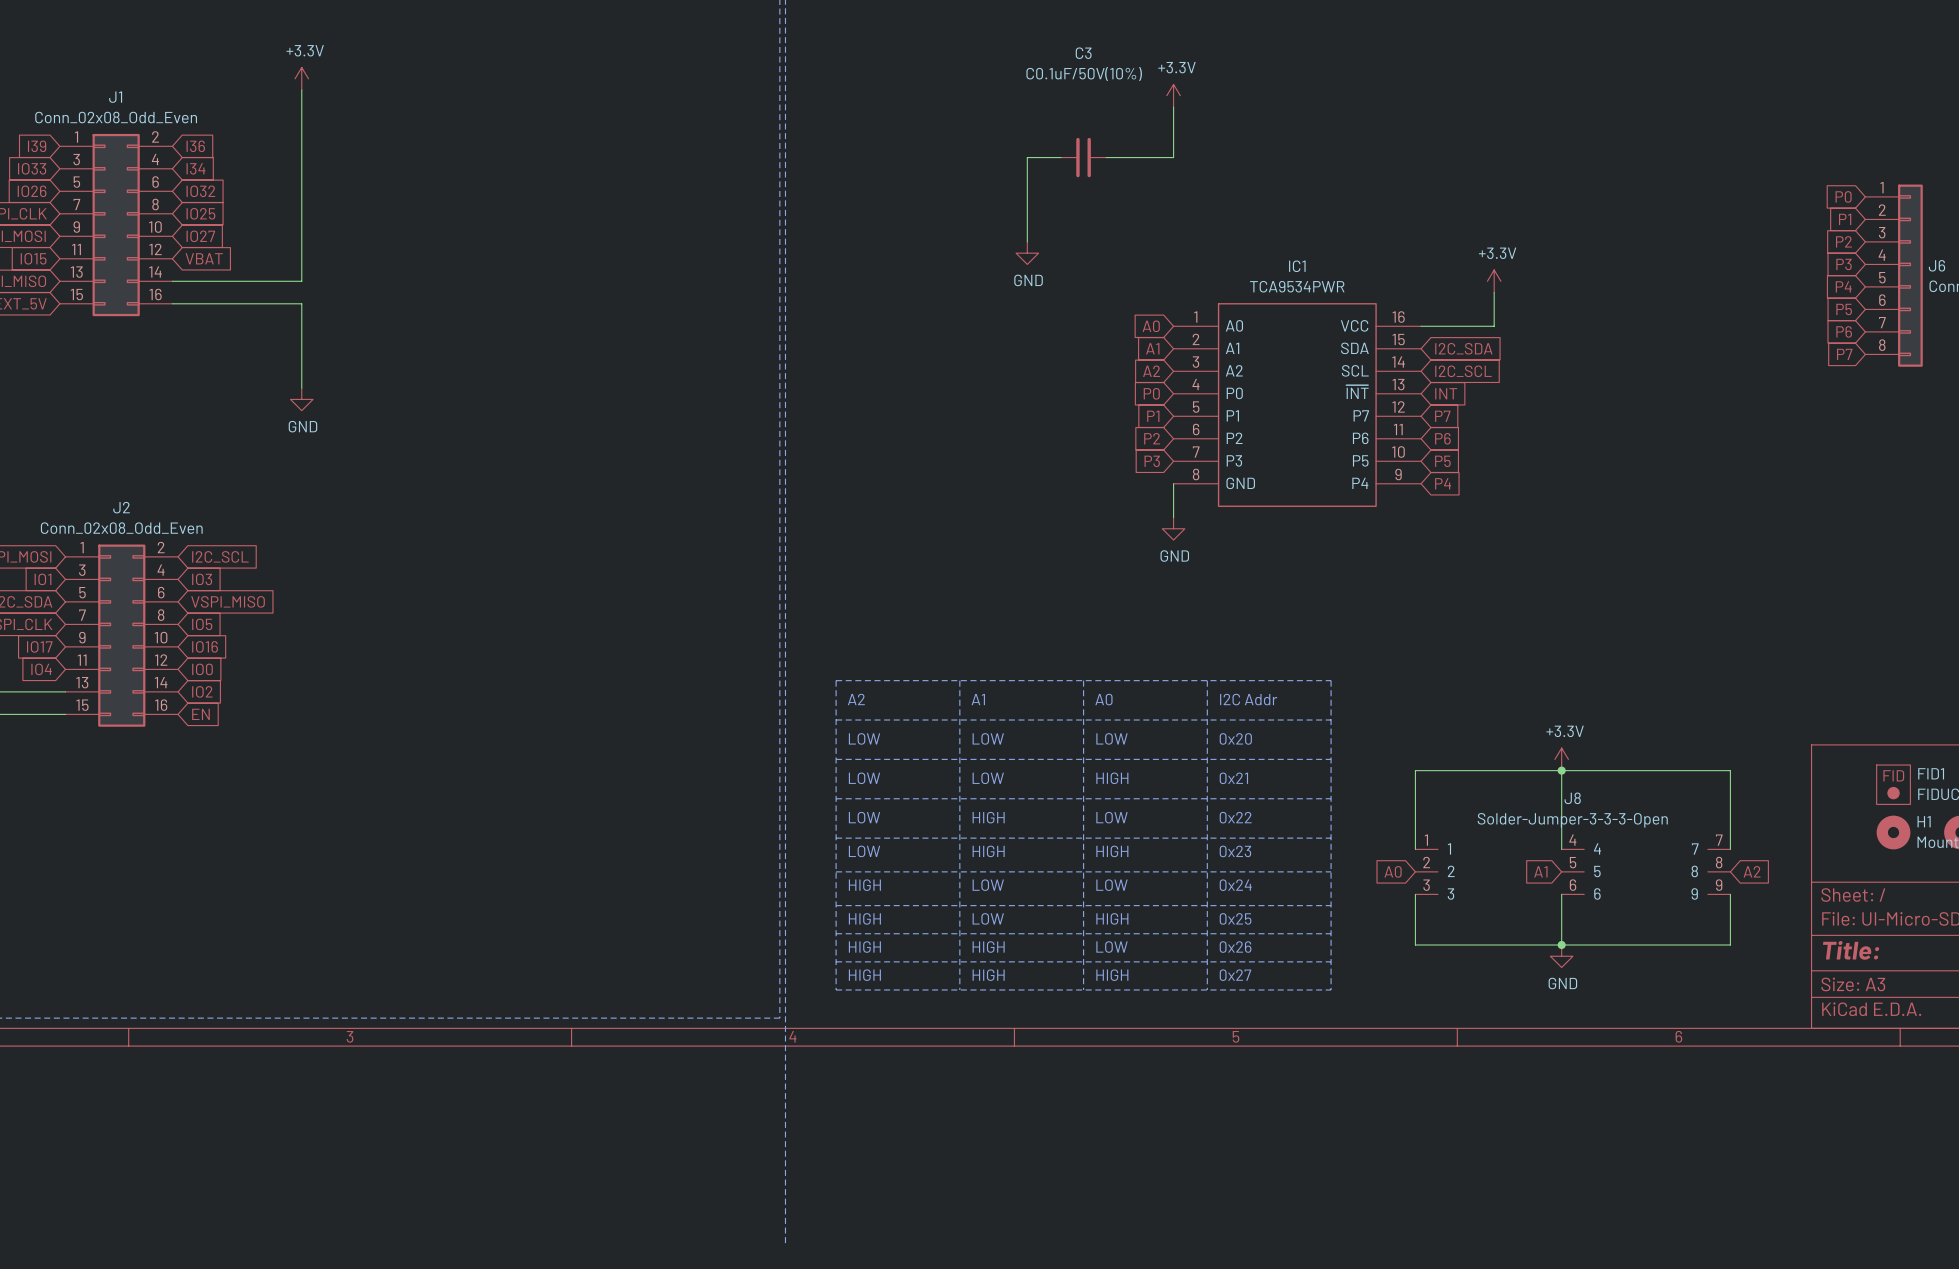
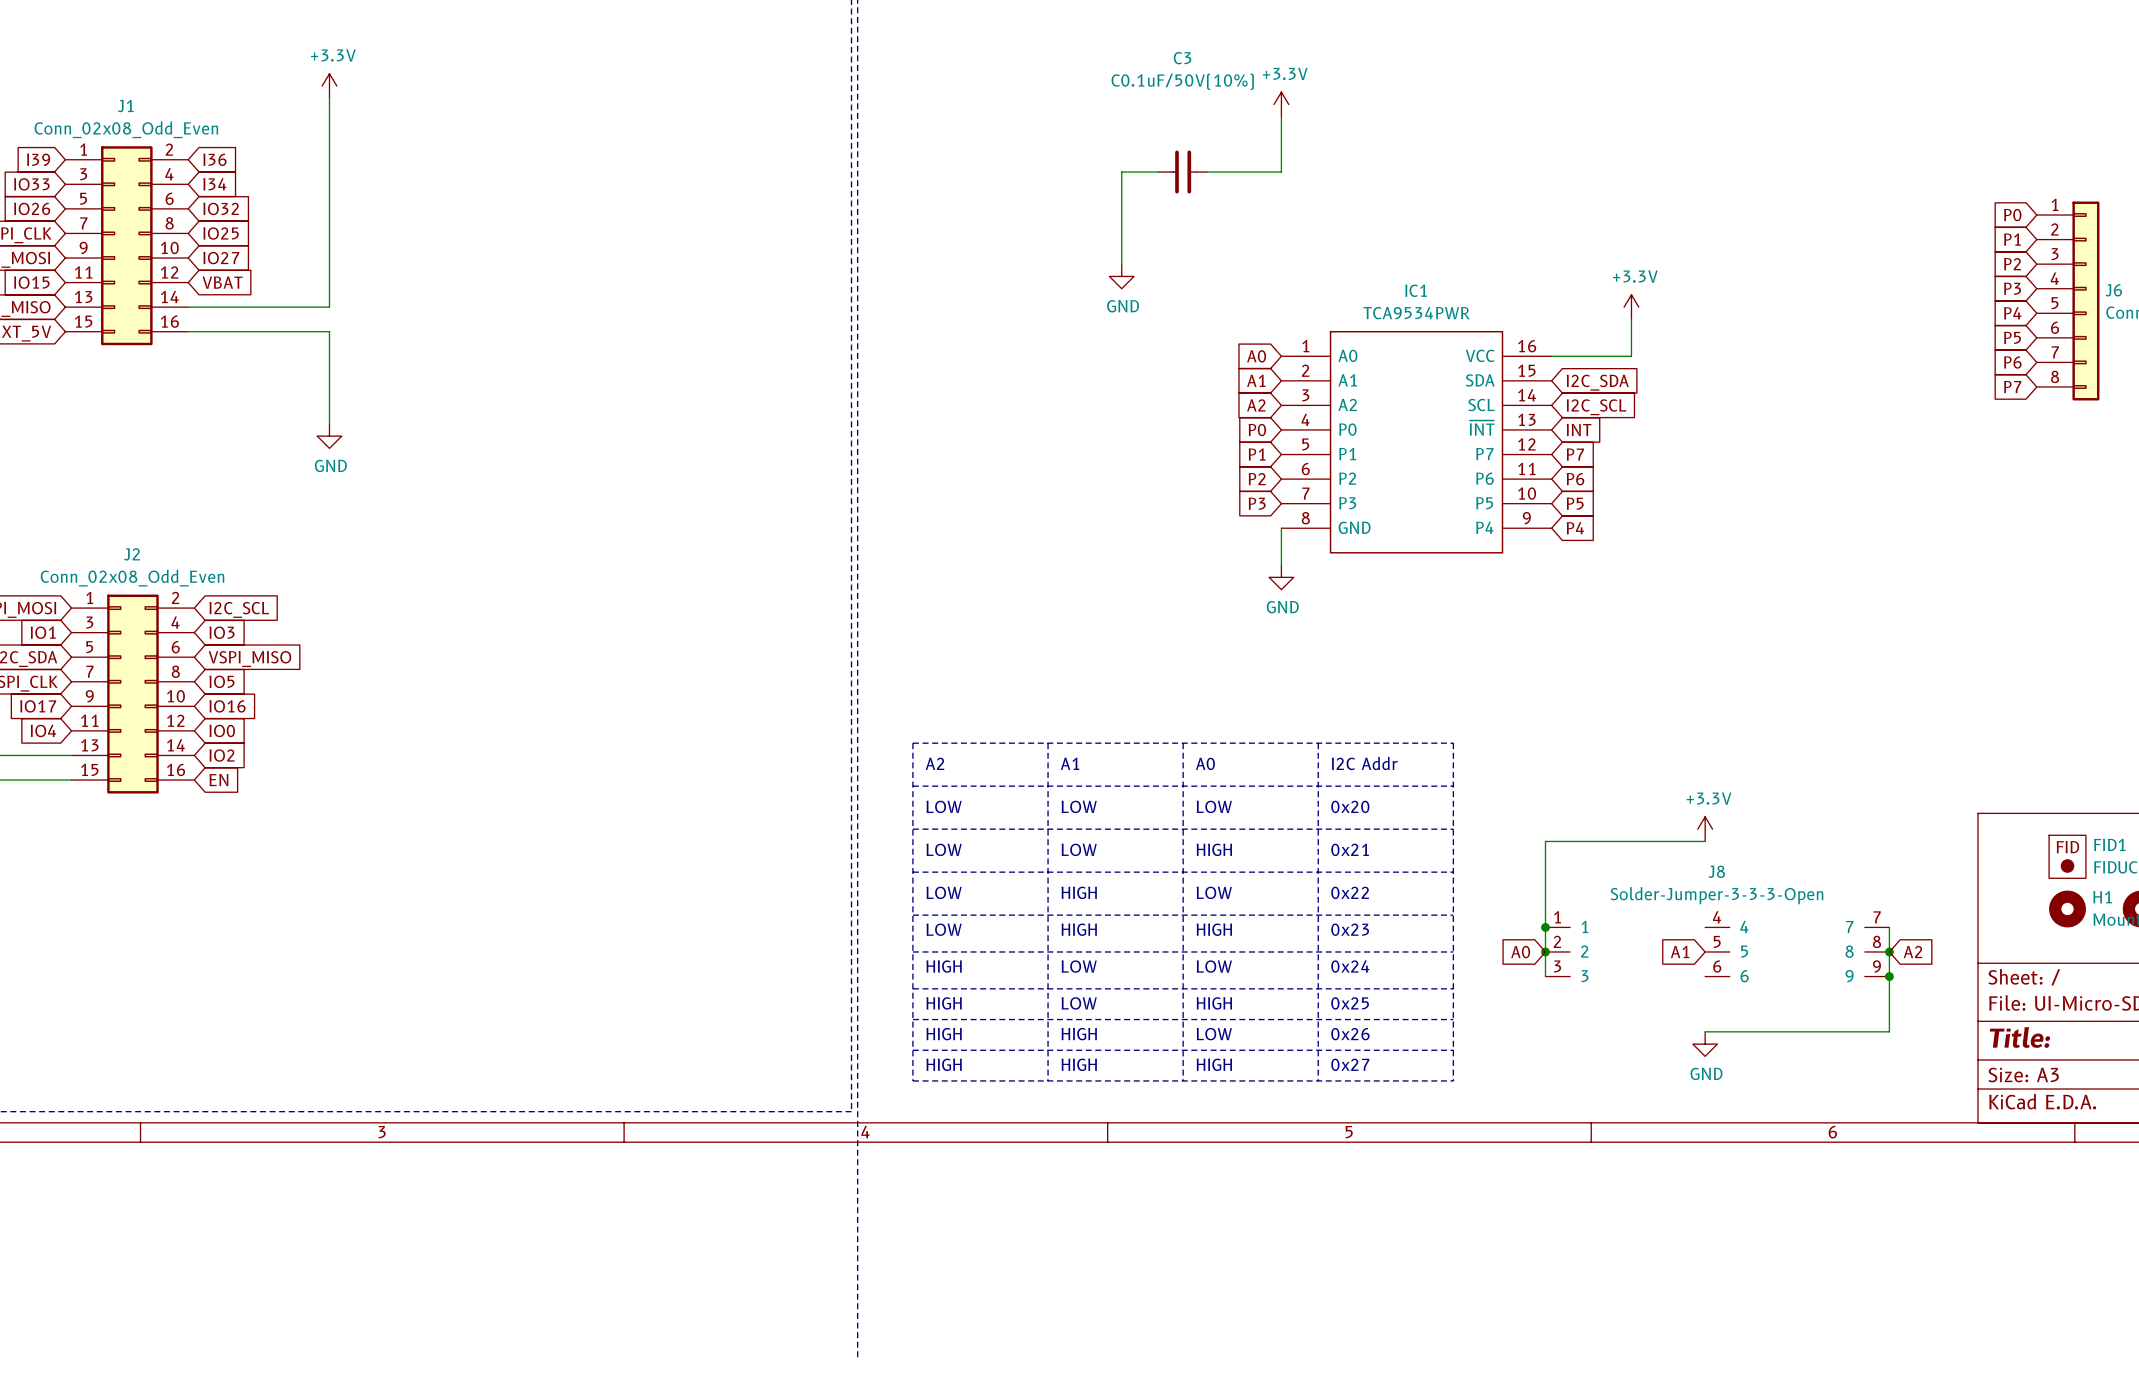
junction: (1561, 770) -> none
junction: none -> (1545, 927)
wire: (1561, 849) (1561, 770) (1730, 770) (1730, 849) -> (1889, 976) (1889, 927)
junction: none -> (1545, 951)
junction: none -> (1889, 951)
wire: (1415, 894) (1415, 945) (1561, 945) (1561, 894) -> (1545, 976) (1545, 927)
junction: none -> (1889, 976)
junction: (1561, 945) -> none

